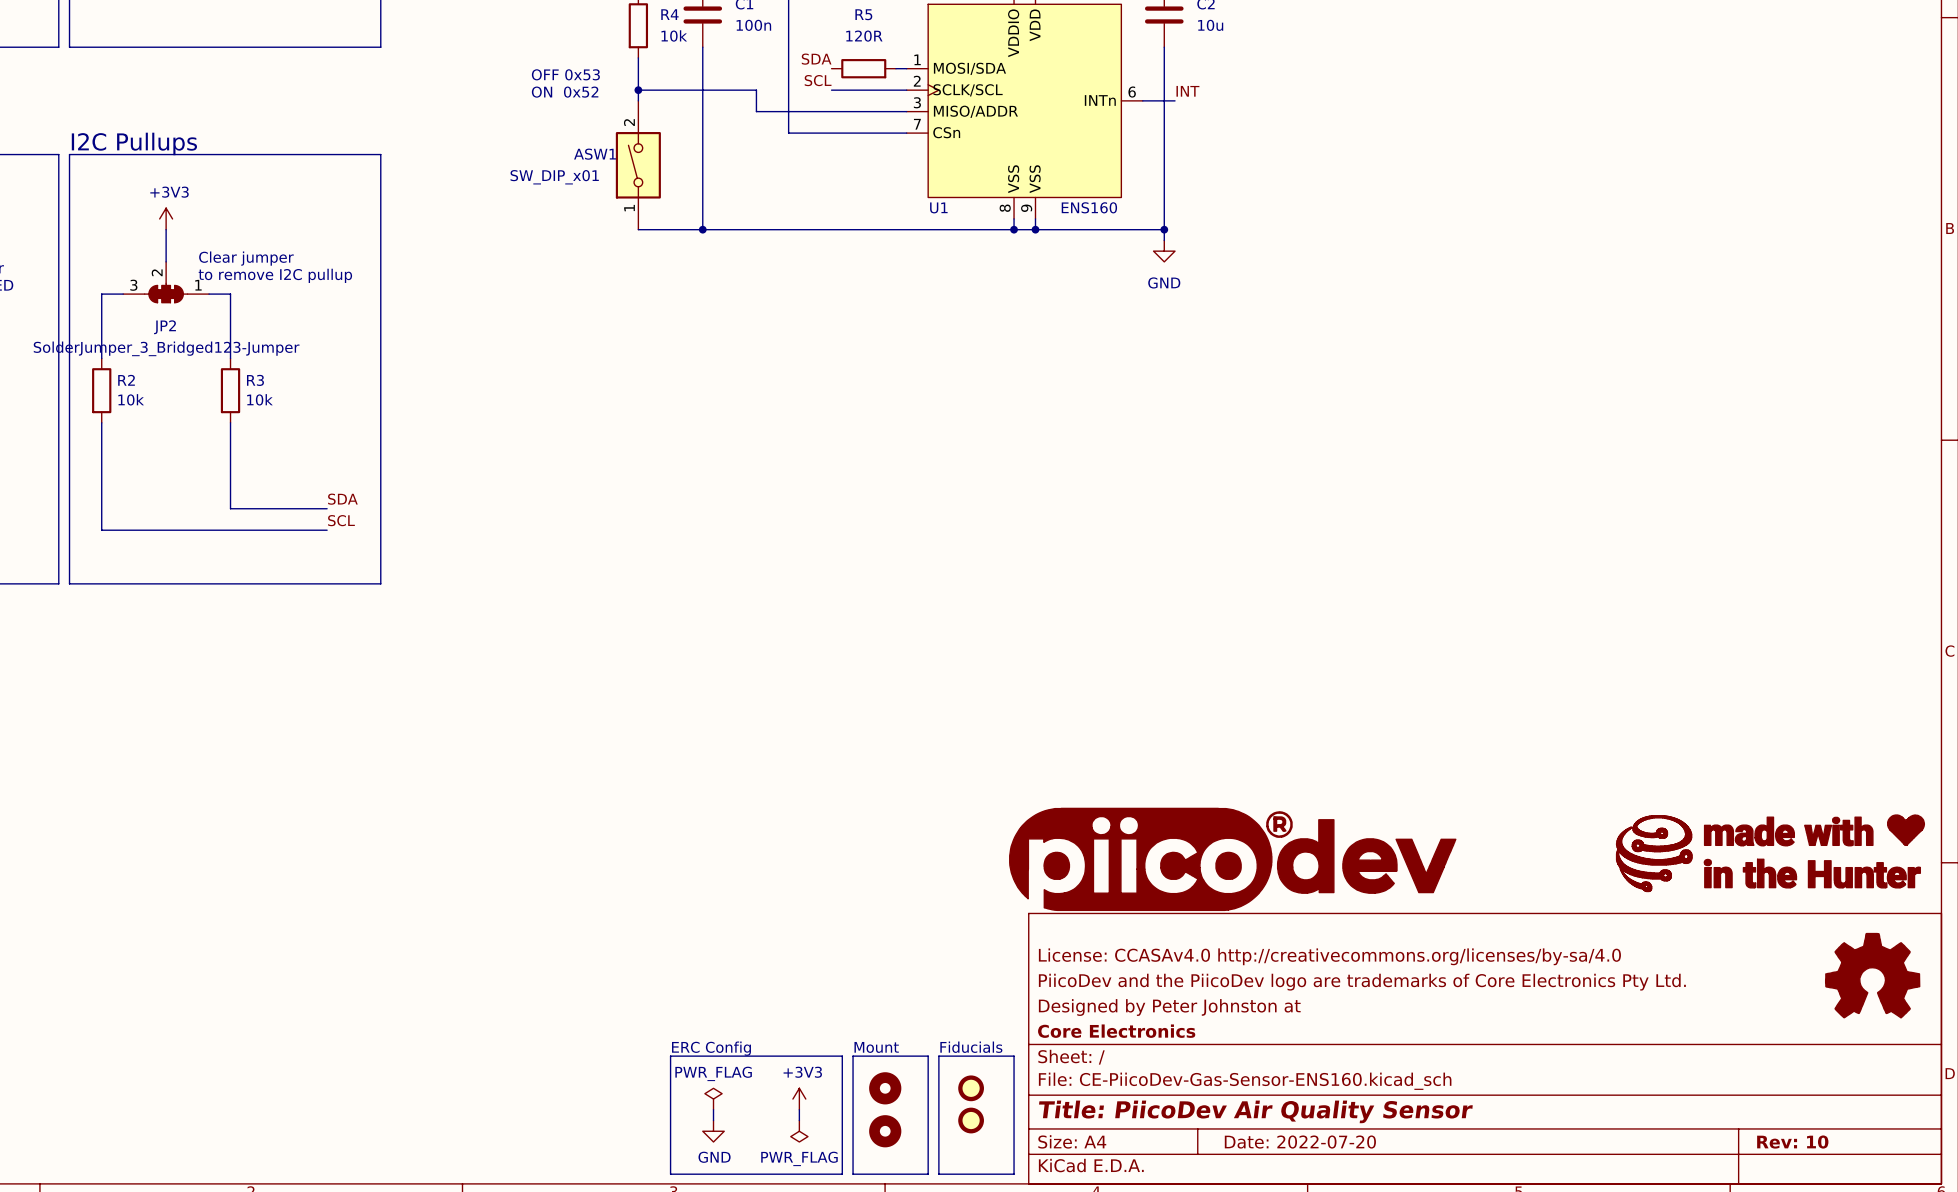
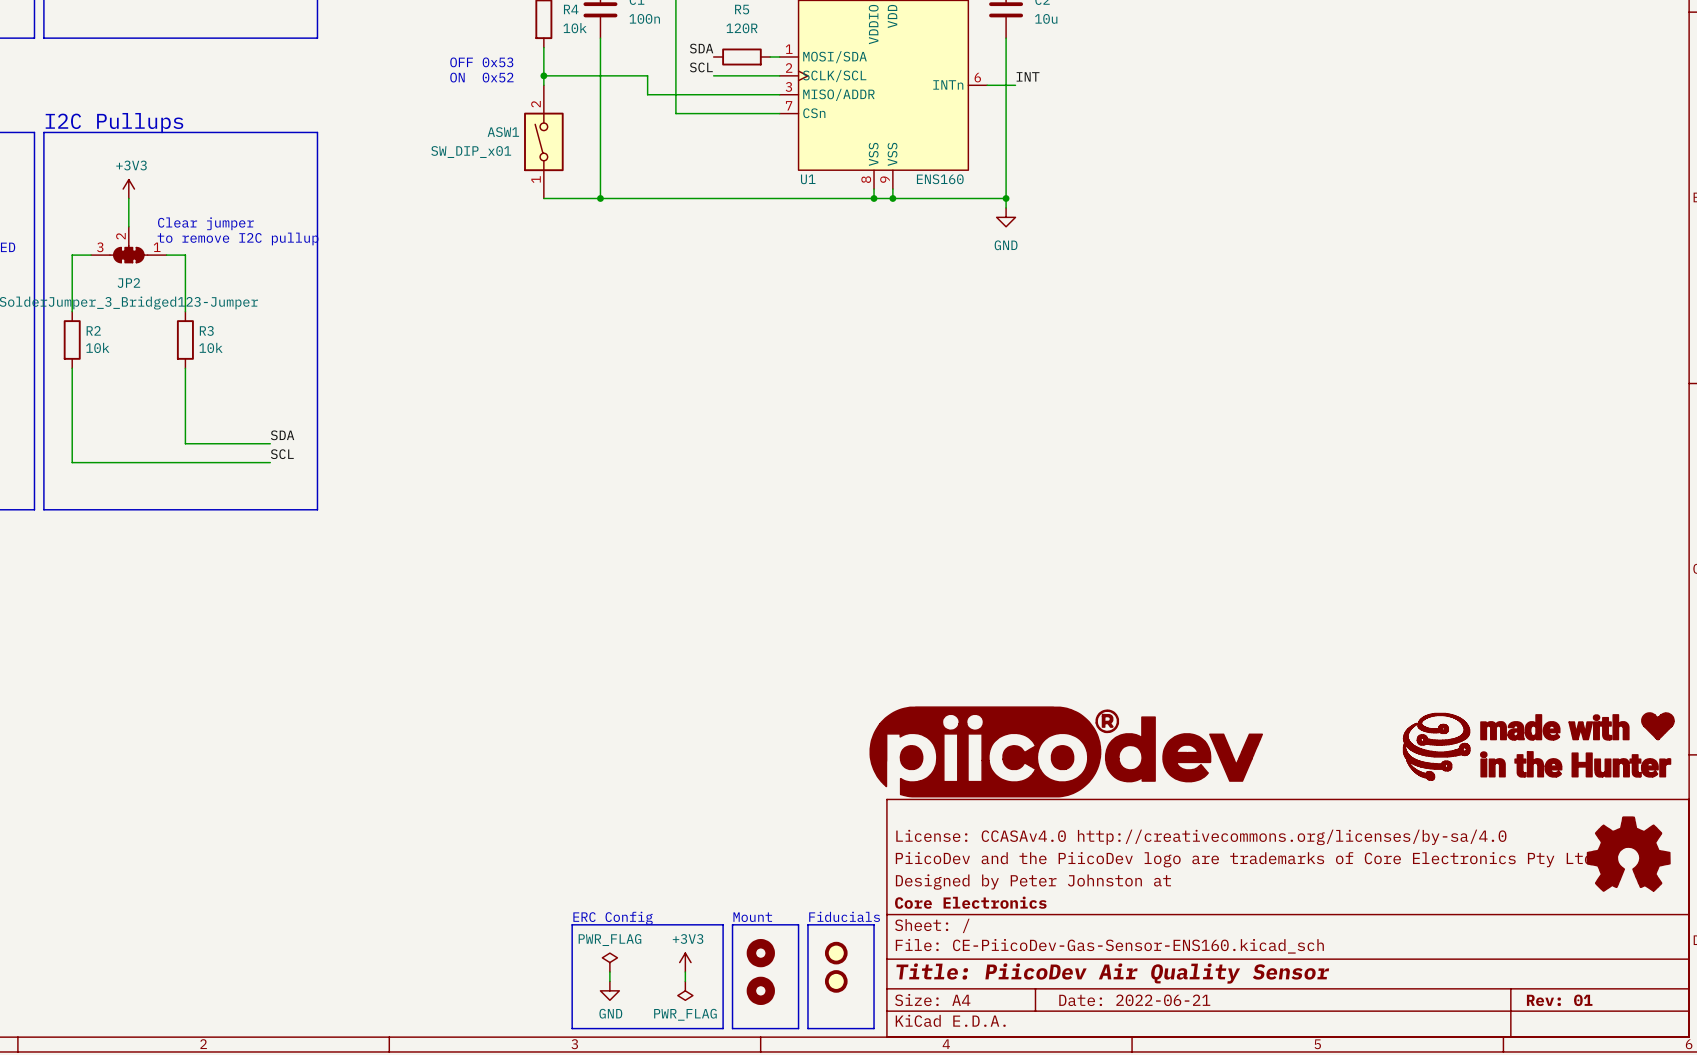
title block: Date: 2022-07-20 (1300, 1142) -> Date: 2022-06-21 (1134, 1000)
title block: Rev: 10 (1792, 1142) -> Rev: 01 (1559, 1000)

